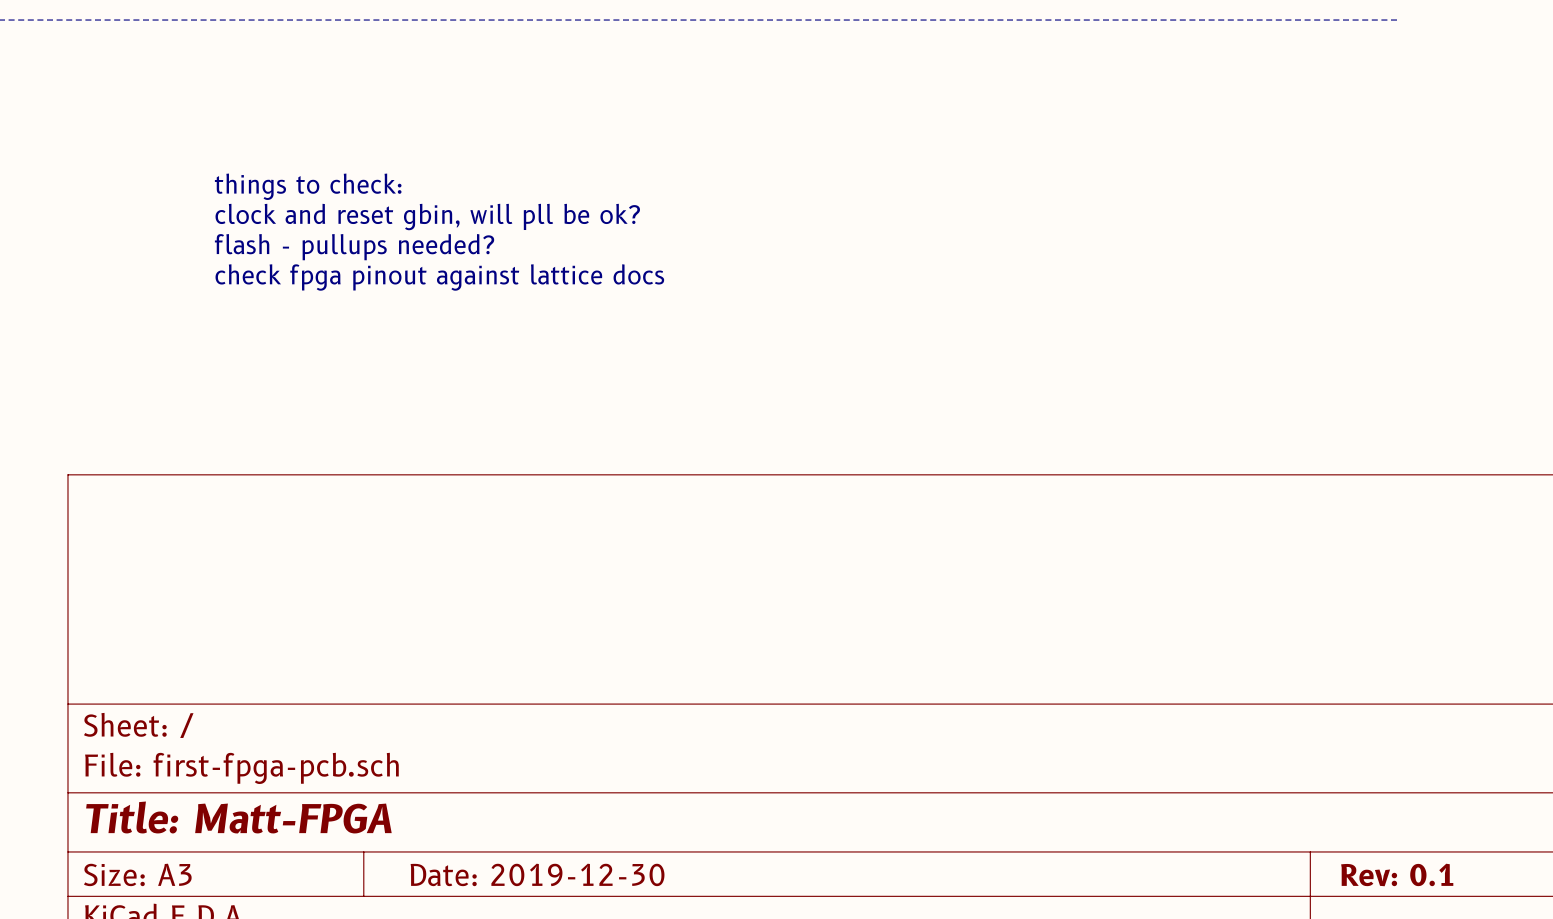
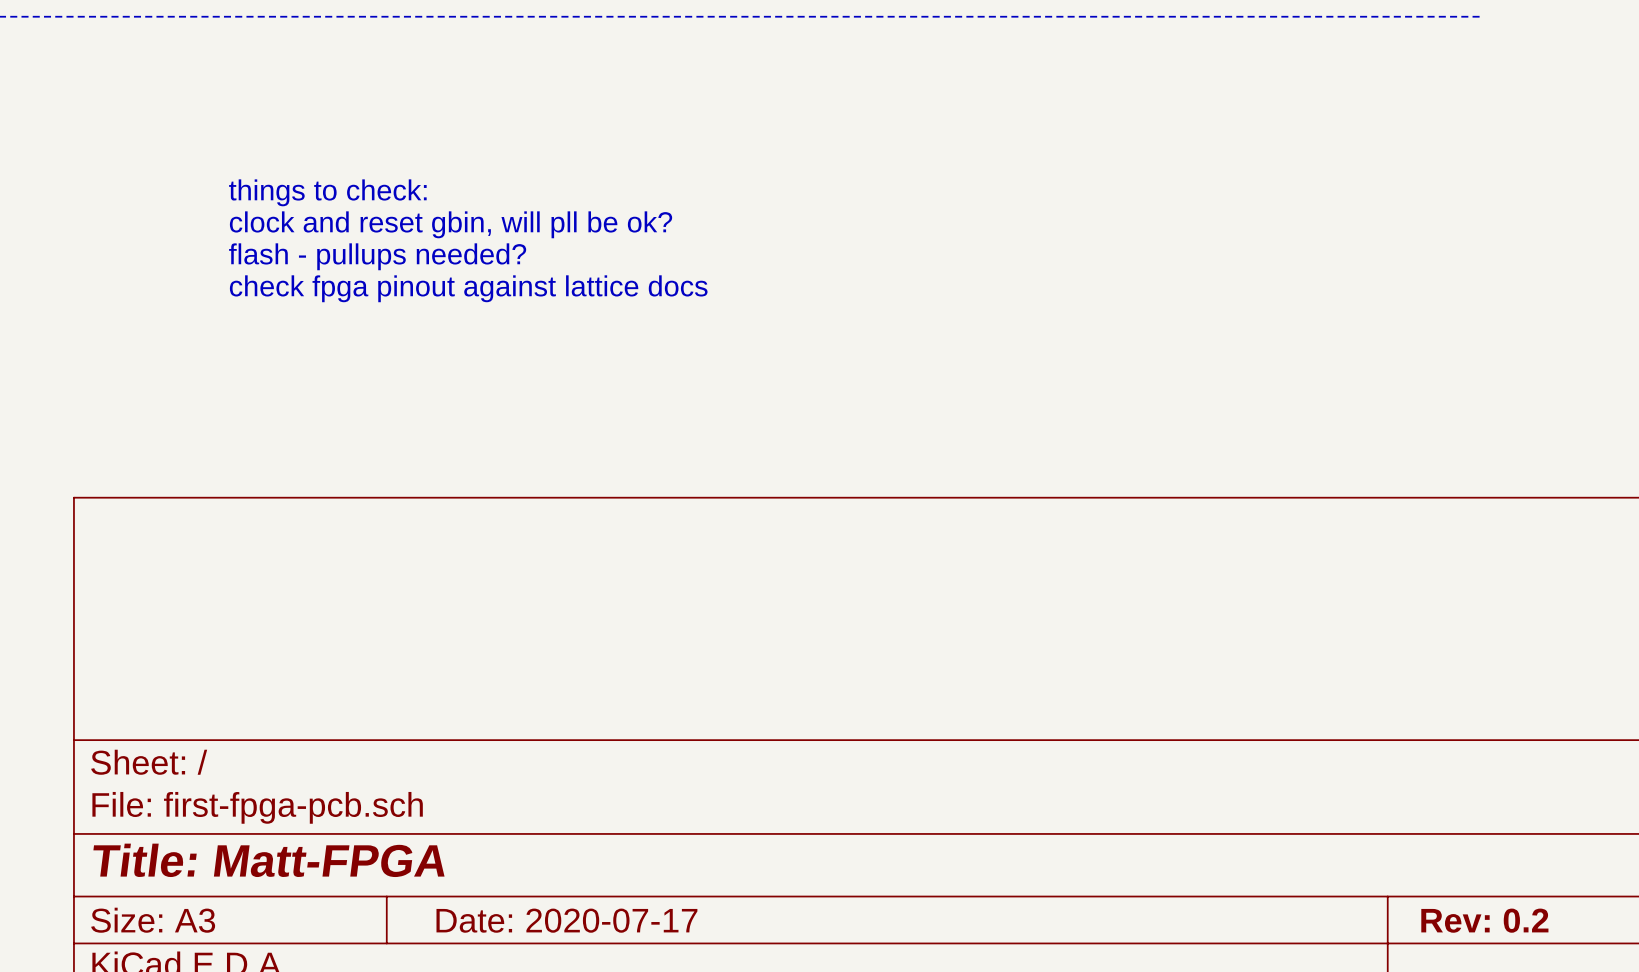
title block: Date: 2019-12-30 (537, 874) -> Date: 2020-07-17 (566, 920)
title block: Rev: 0.1 (1397, 875) -> Rev: 0.2 (1484, 920)

